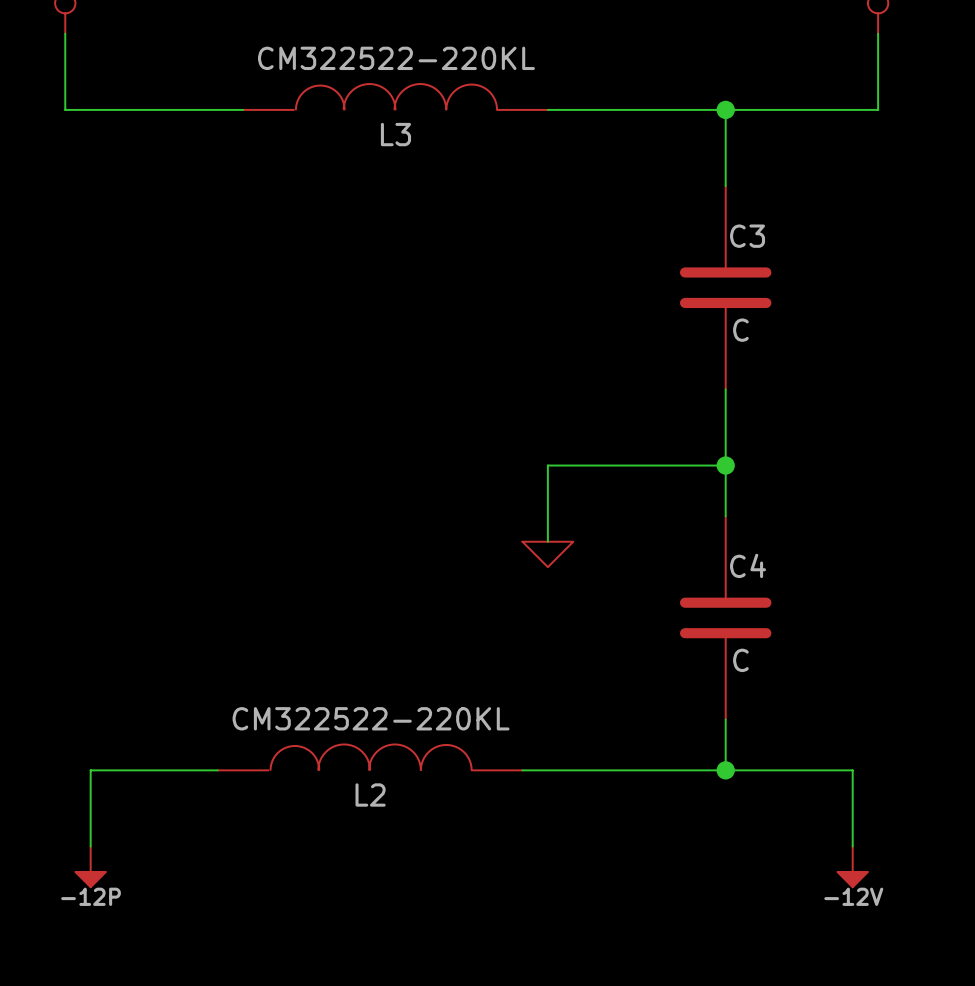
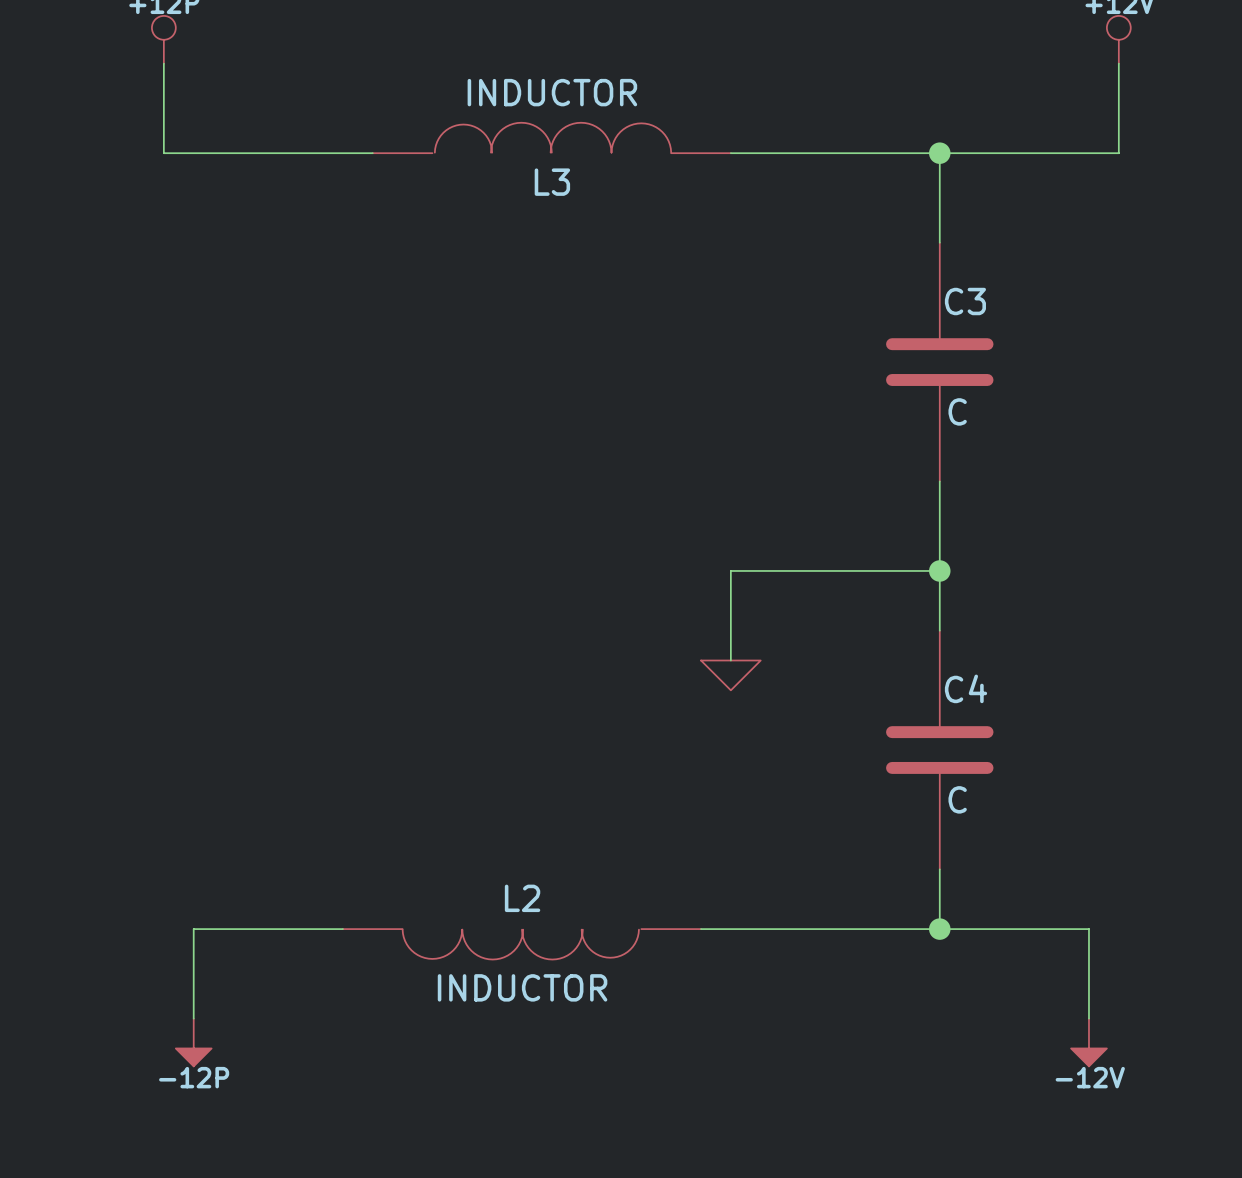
L3 value: CM322522-220KL (396, 58) -> INDUCTOR (552, 92)
L2 value: CM322522-220KL (371, 718) -> INDUCTOR (522, 987)
L2 rotation: 0° (371, 757) -> 180° (520, 944)

